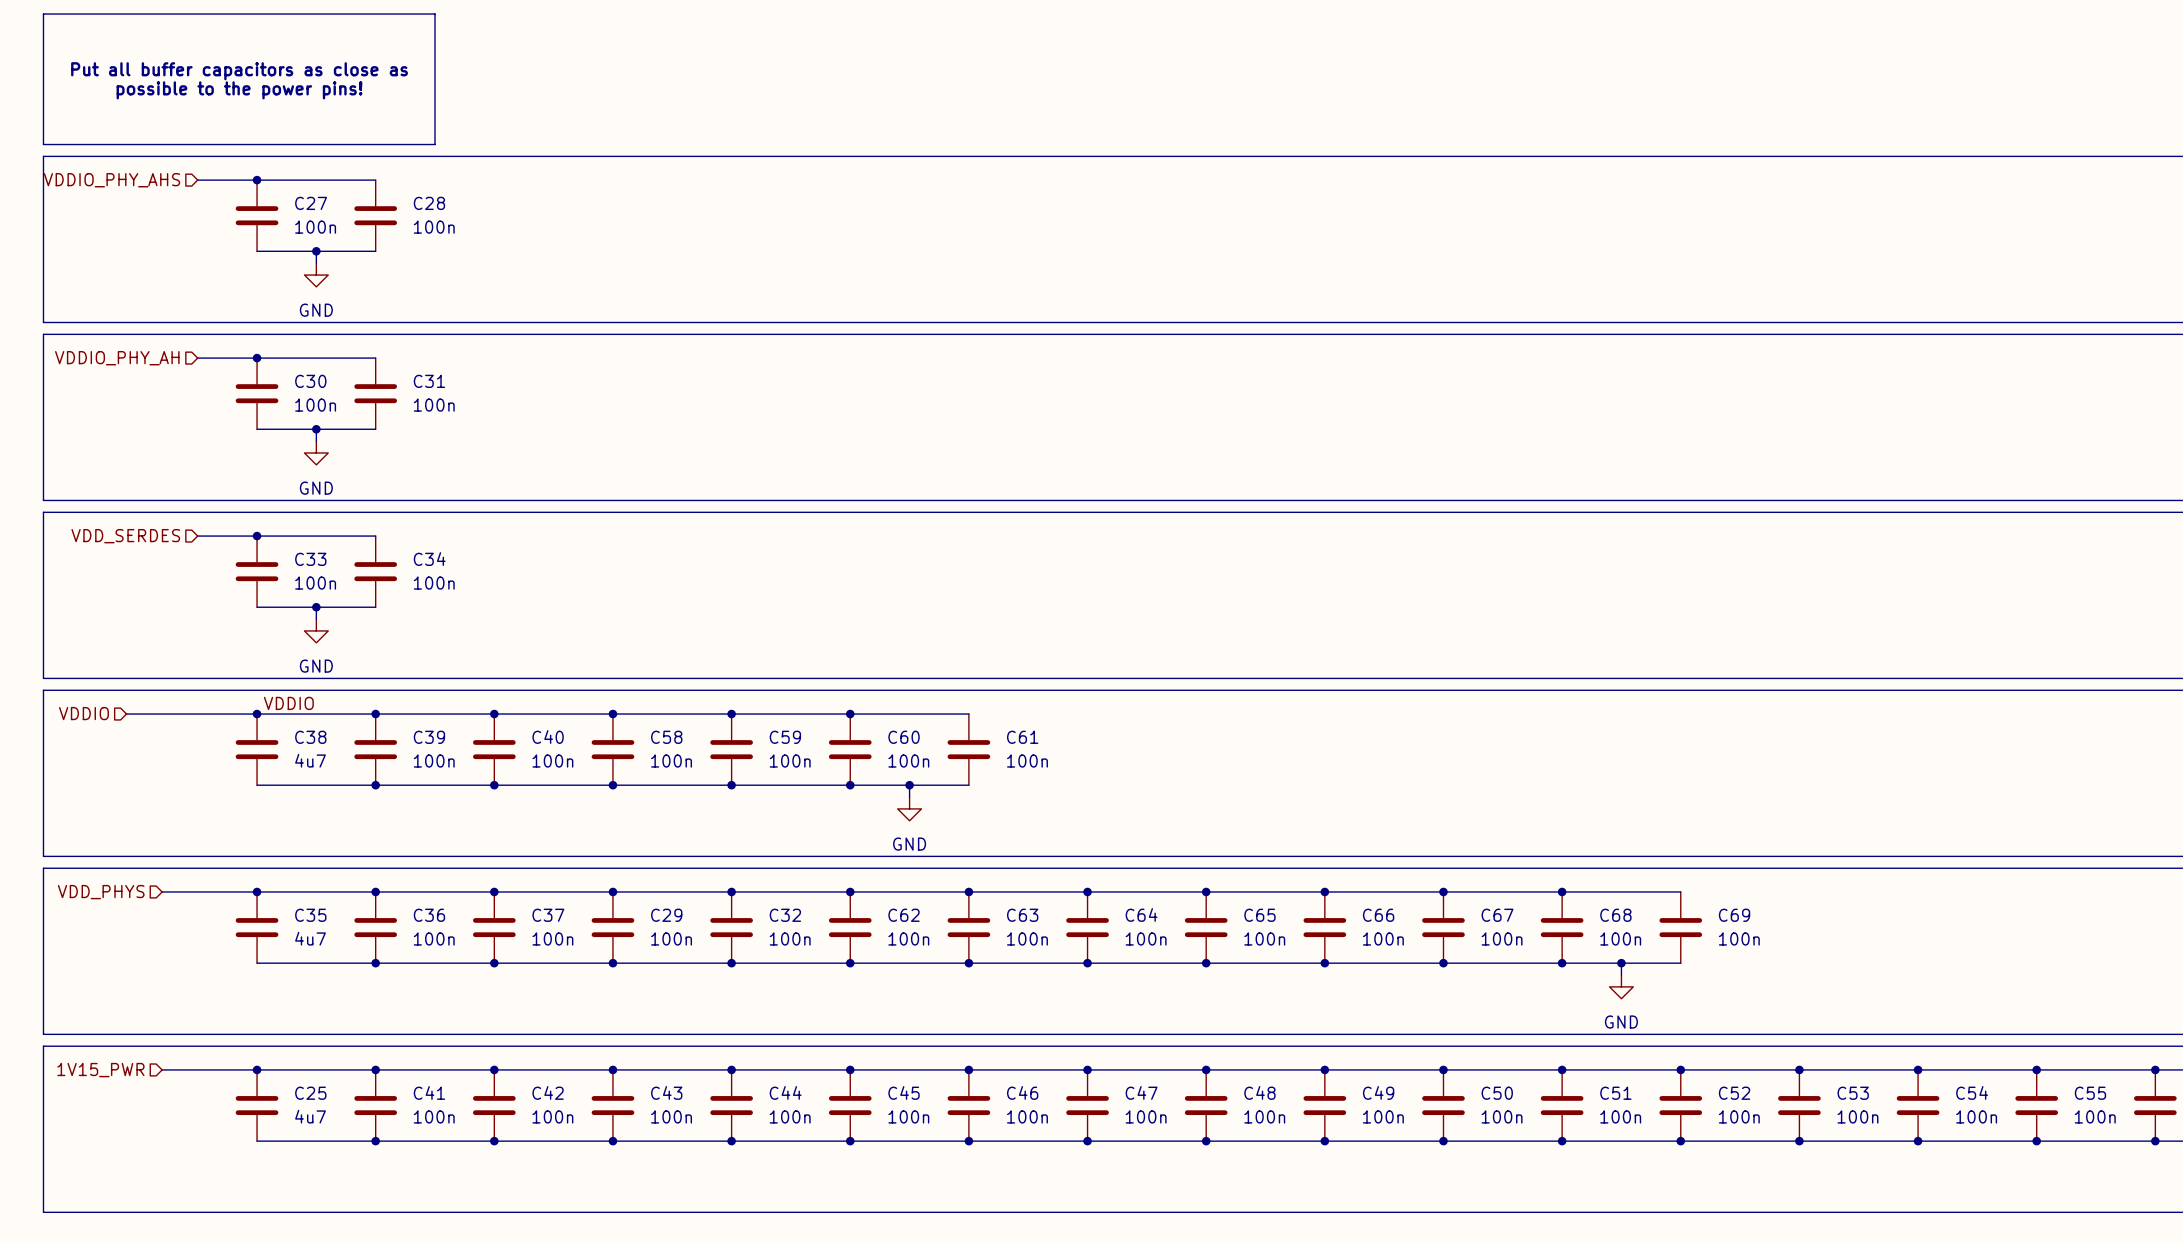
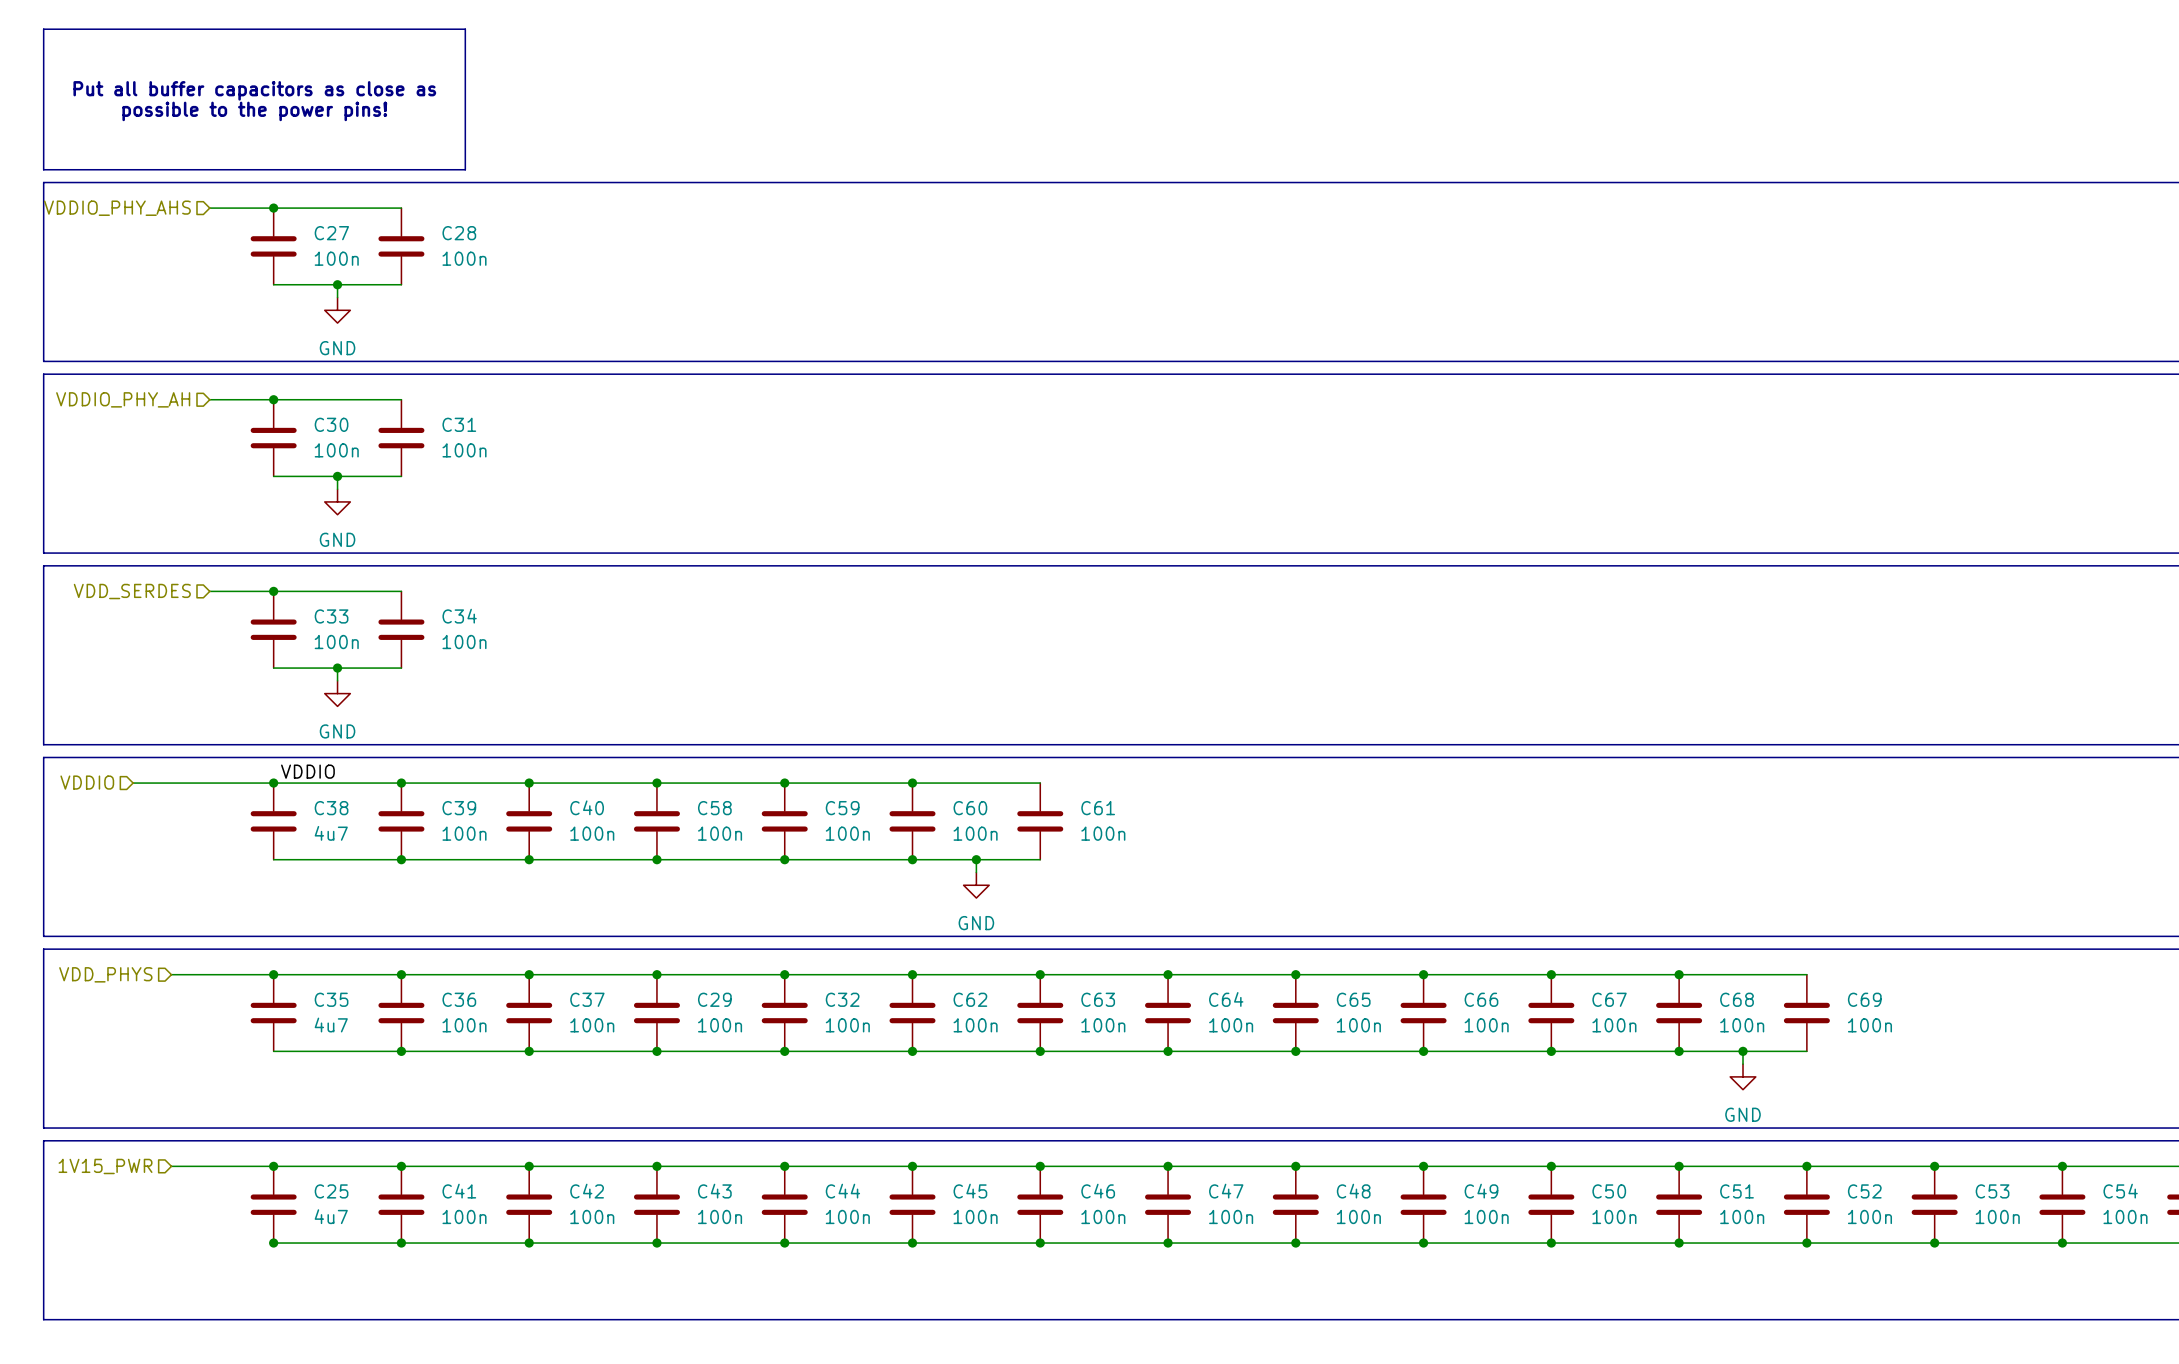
junction: none -> (273, 1243)

